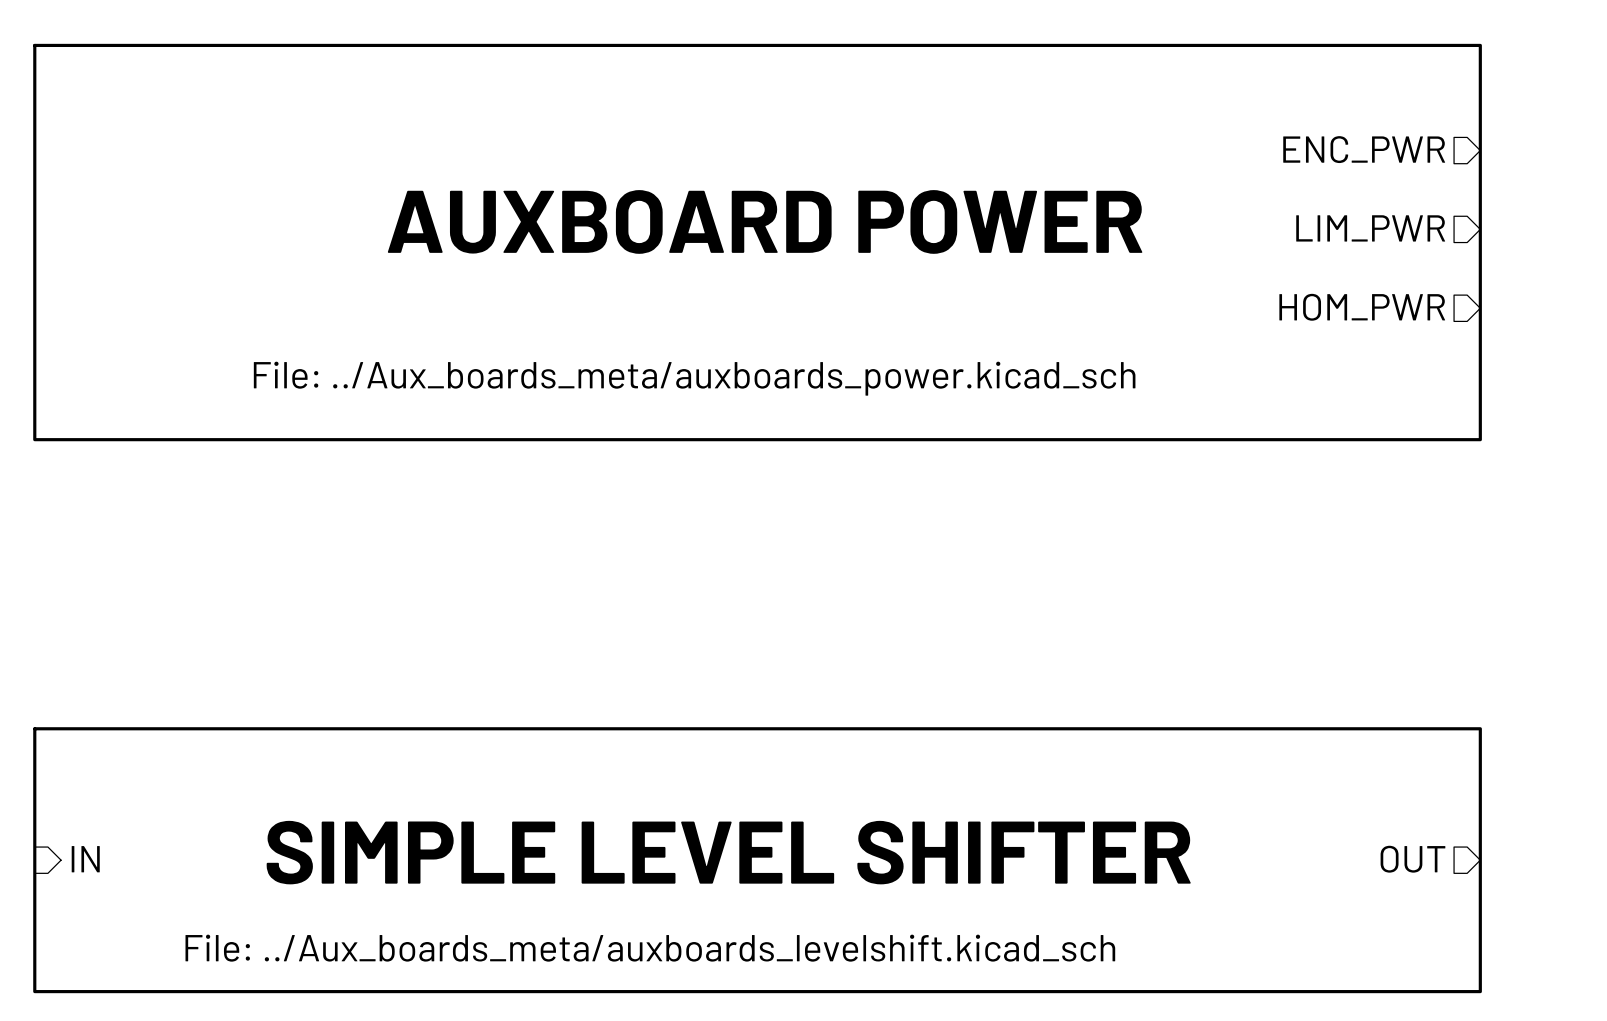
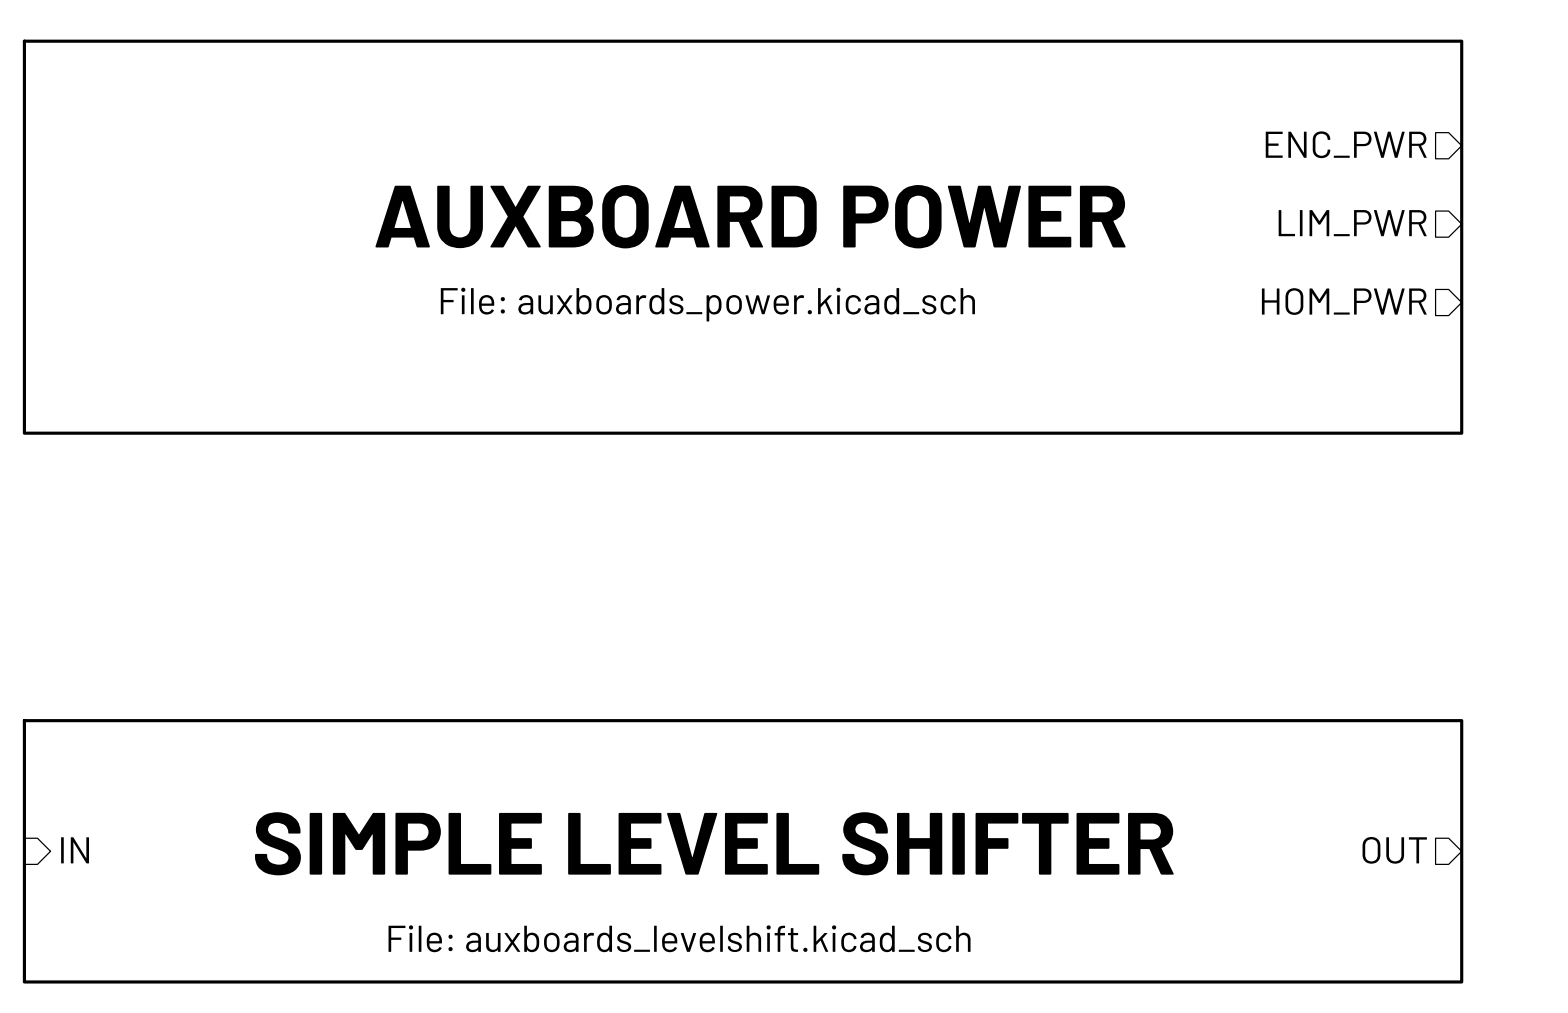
sheet AUXBOARD POWER value: File: ../Aux_boards_meta/auxboards_power.kicad_sch (694, 378) -> File: auxboards_power.kicad_sch (707, 304)
sheet SIMPLE LEVEL SHIFTER value: File: ../Aux_boards_meta/auxboards_levelshift.kicad_sch (650, 948) -> File: auxboards_levelshift.kicad_sch (679, 938)

